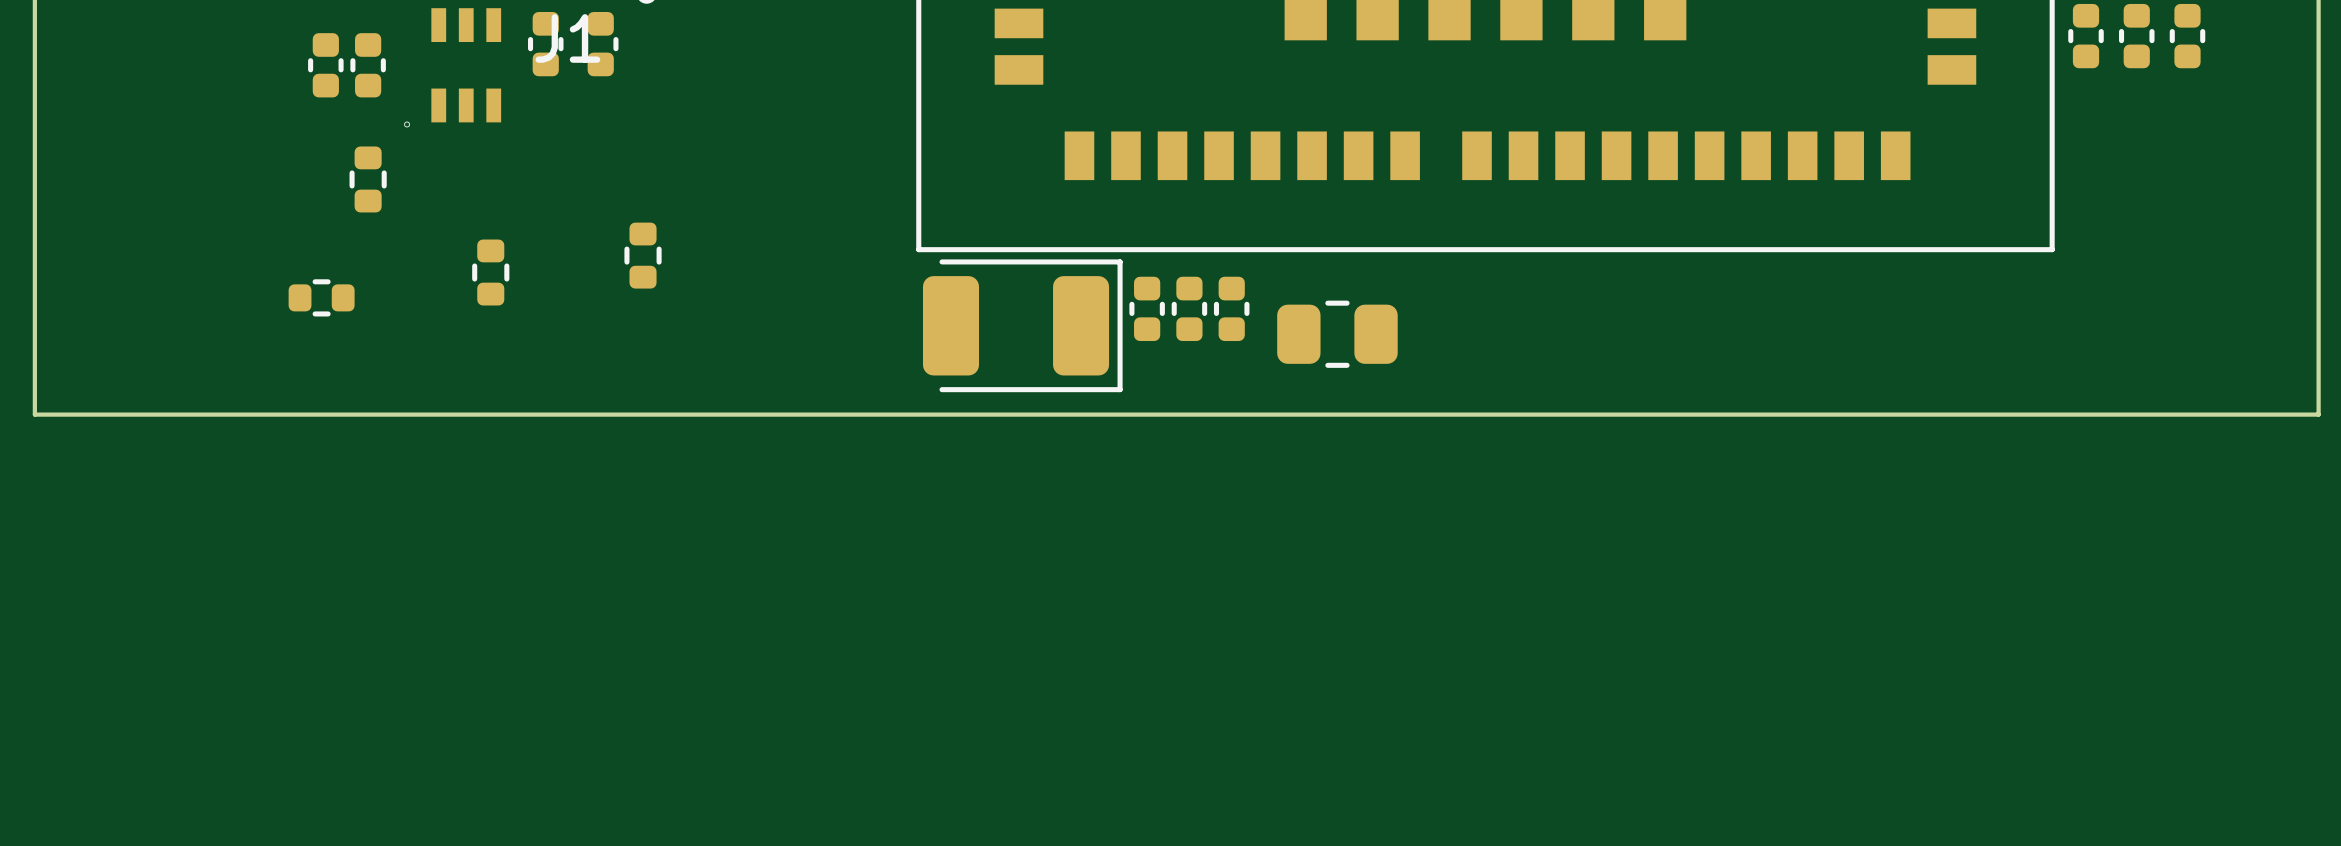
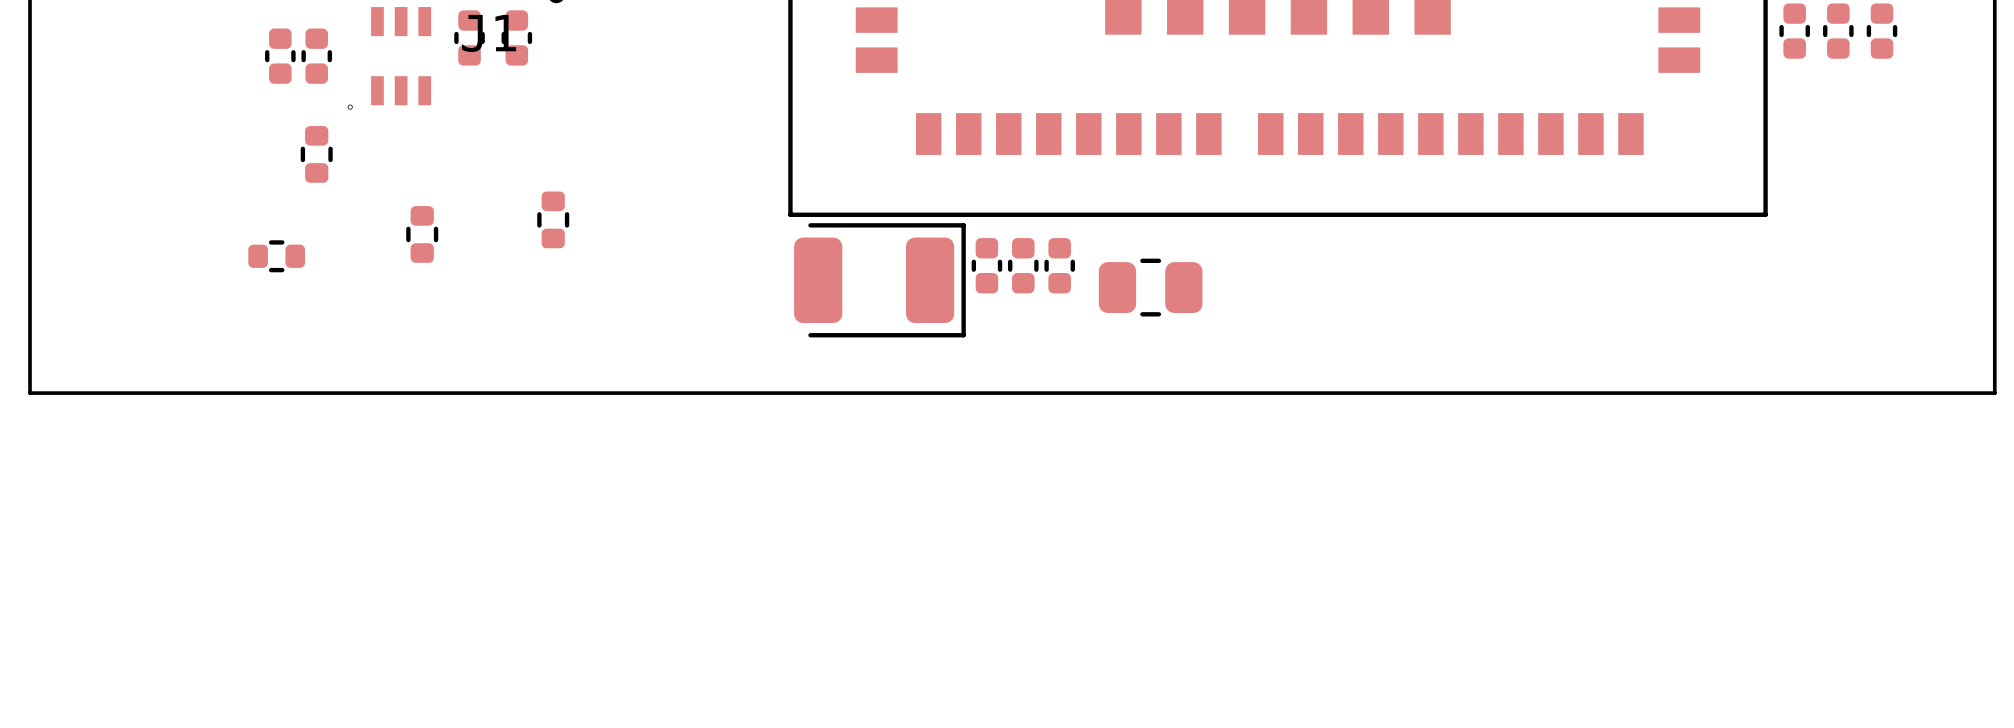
board edge: (34, 414) (2318, 414) -> (30, 356) (30, 393) (1994, 393) (1994, 356)

